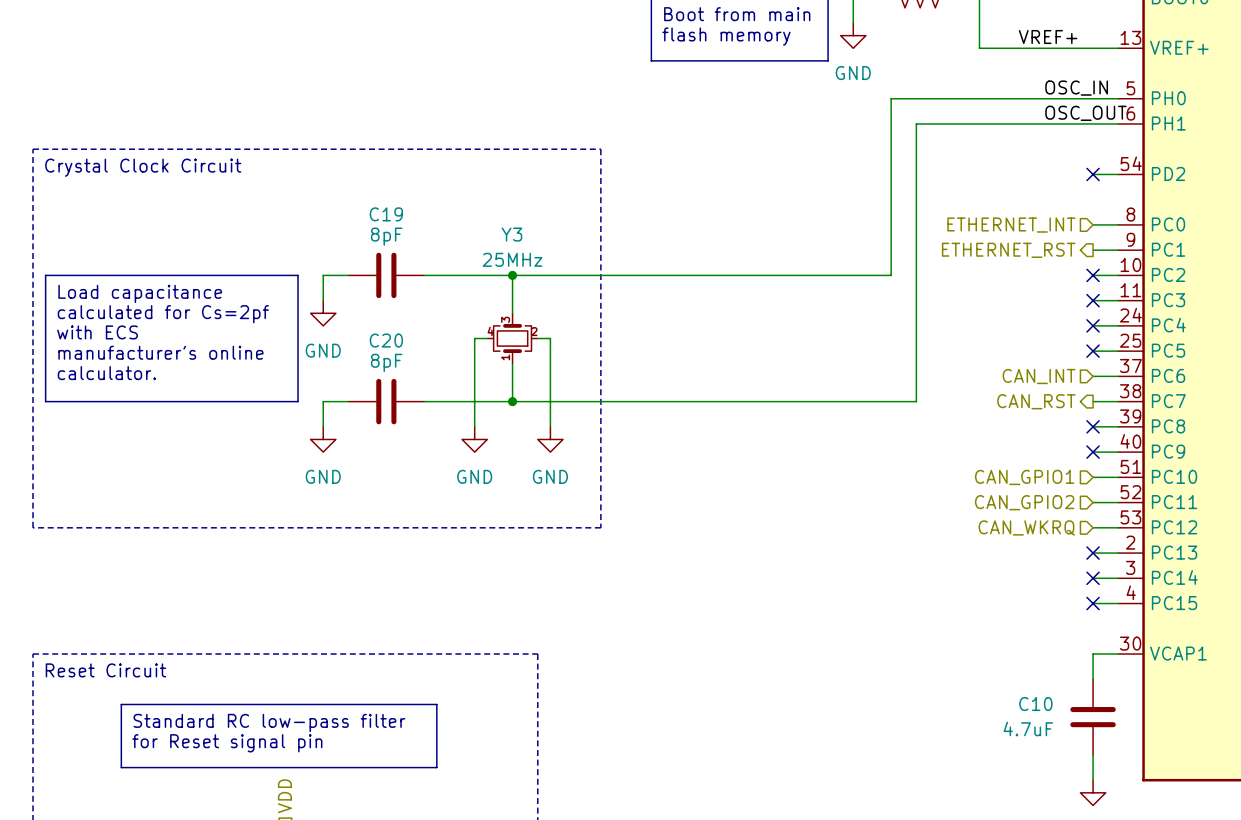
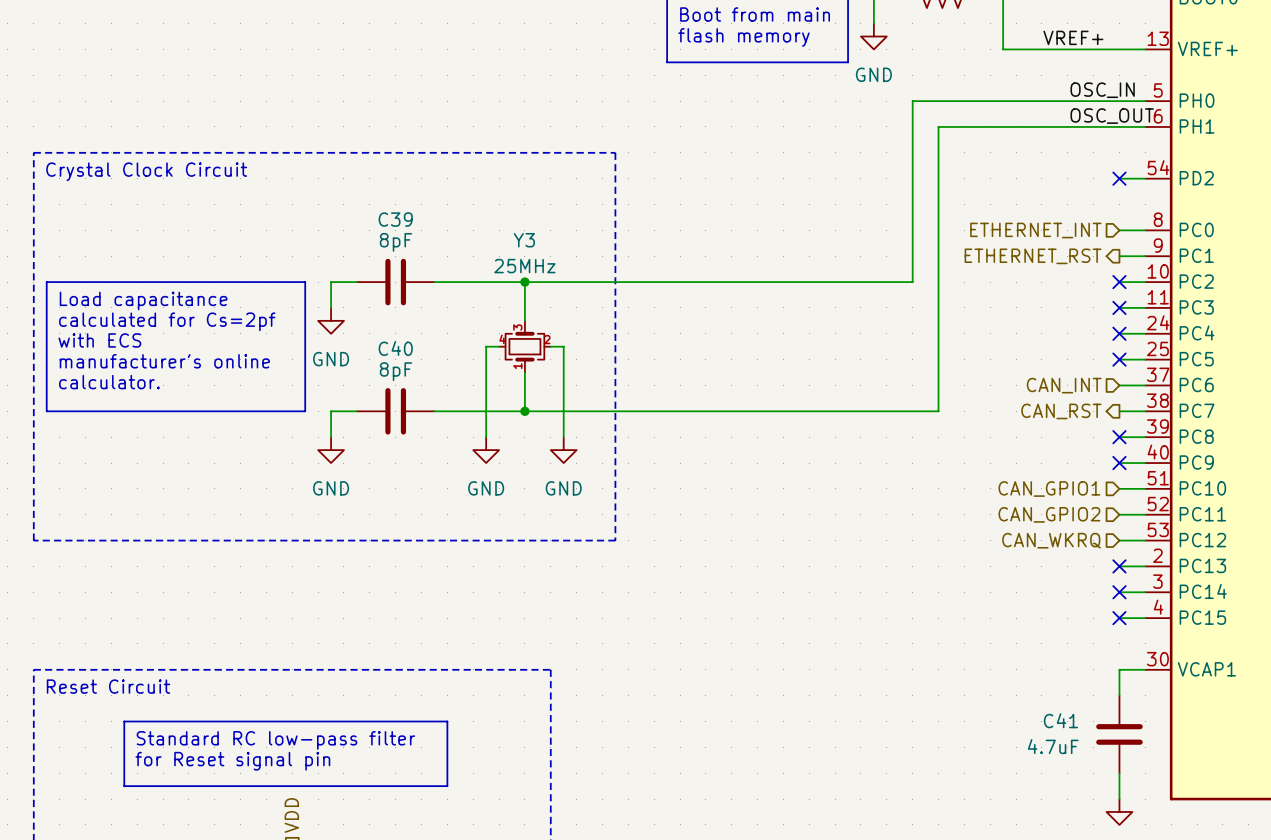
C19 name: C19 (386, 214) -> C39 (395, 219)
C20 name: C20 (386, 340) -> C40 (395, 348)
C10 name: C10 (1035, 704) -> C41 (1060, 720)

